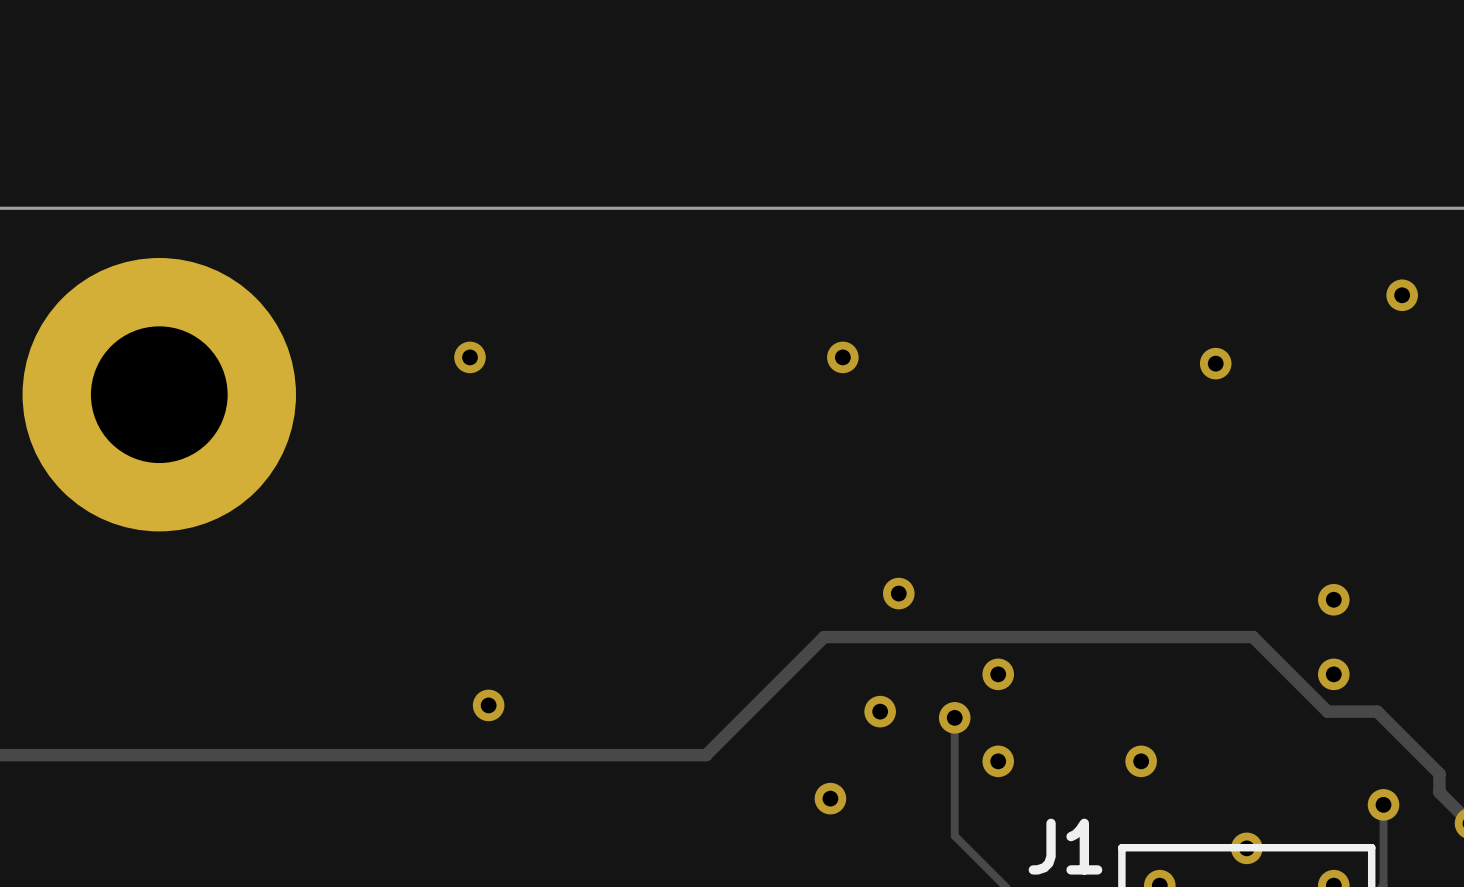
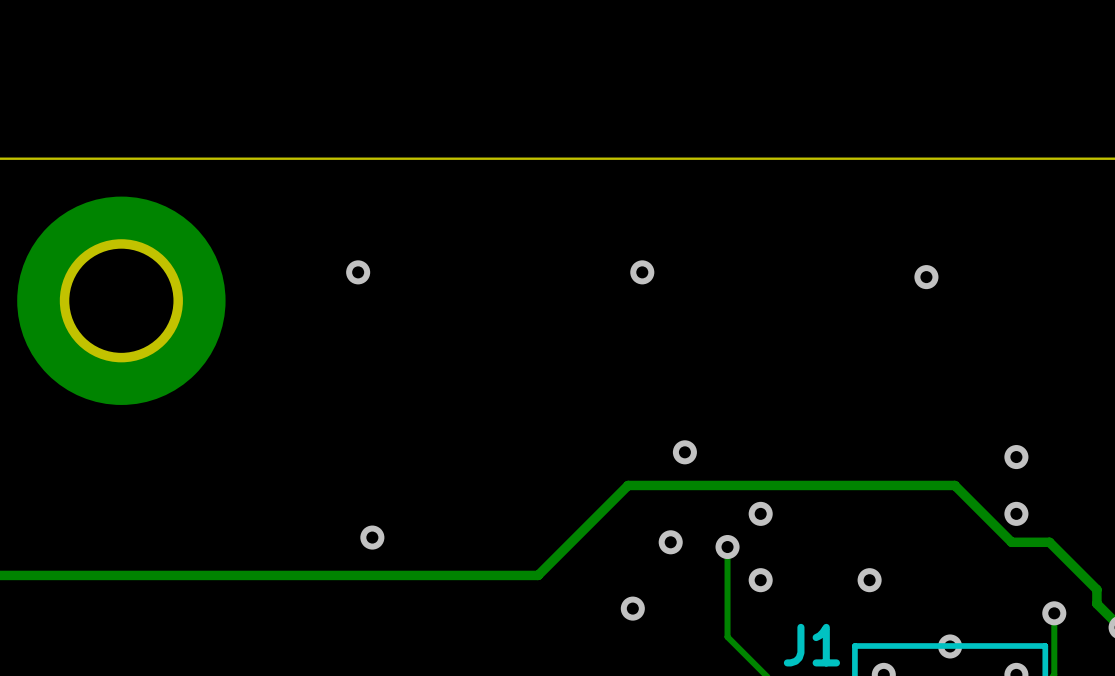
via: (1402, 295) -> none

